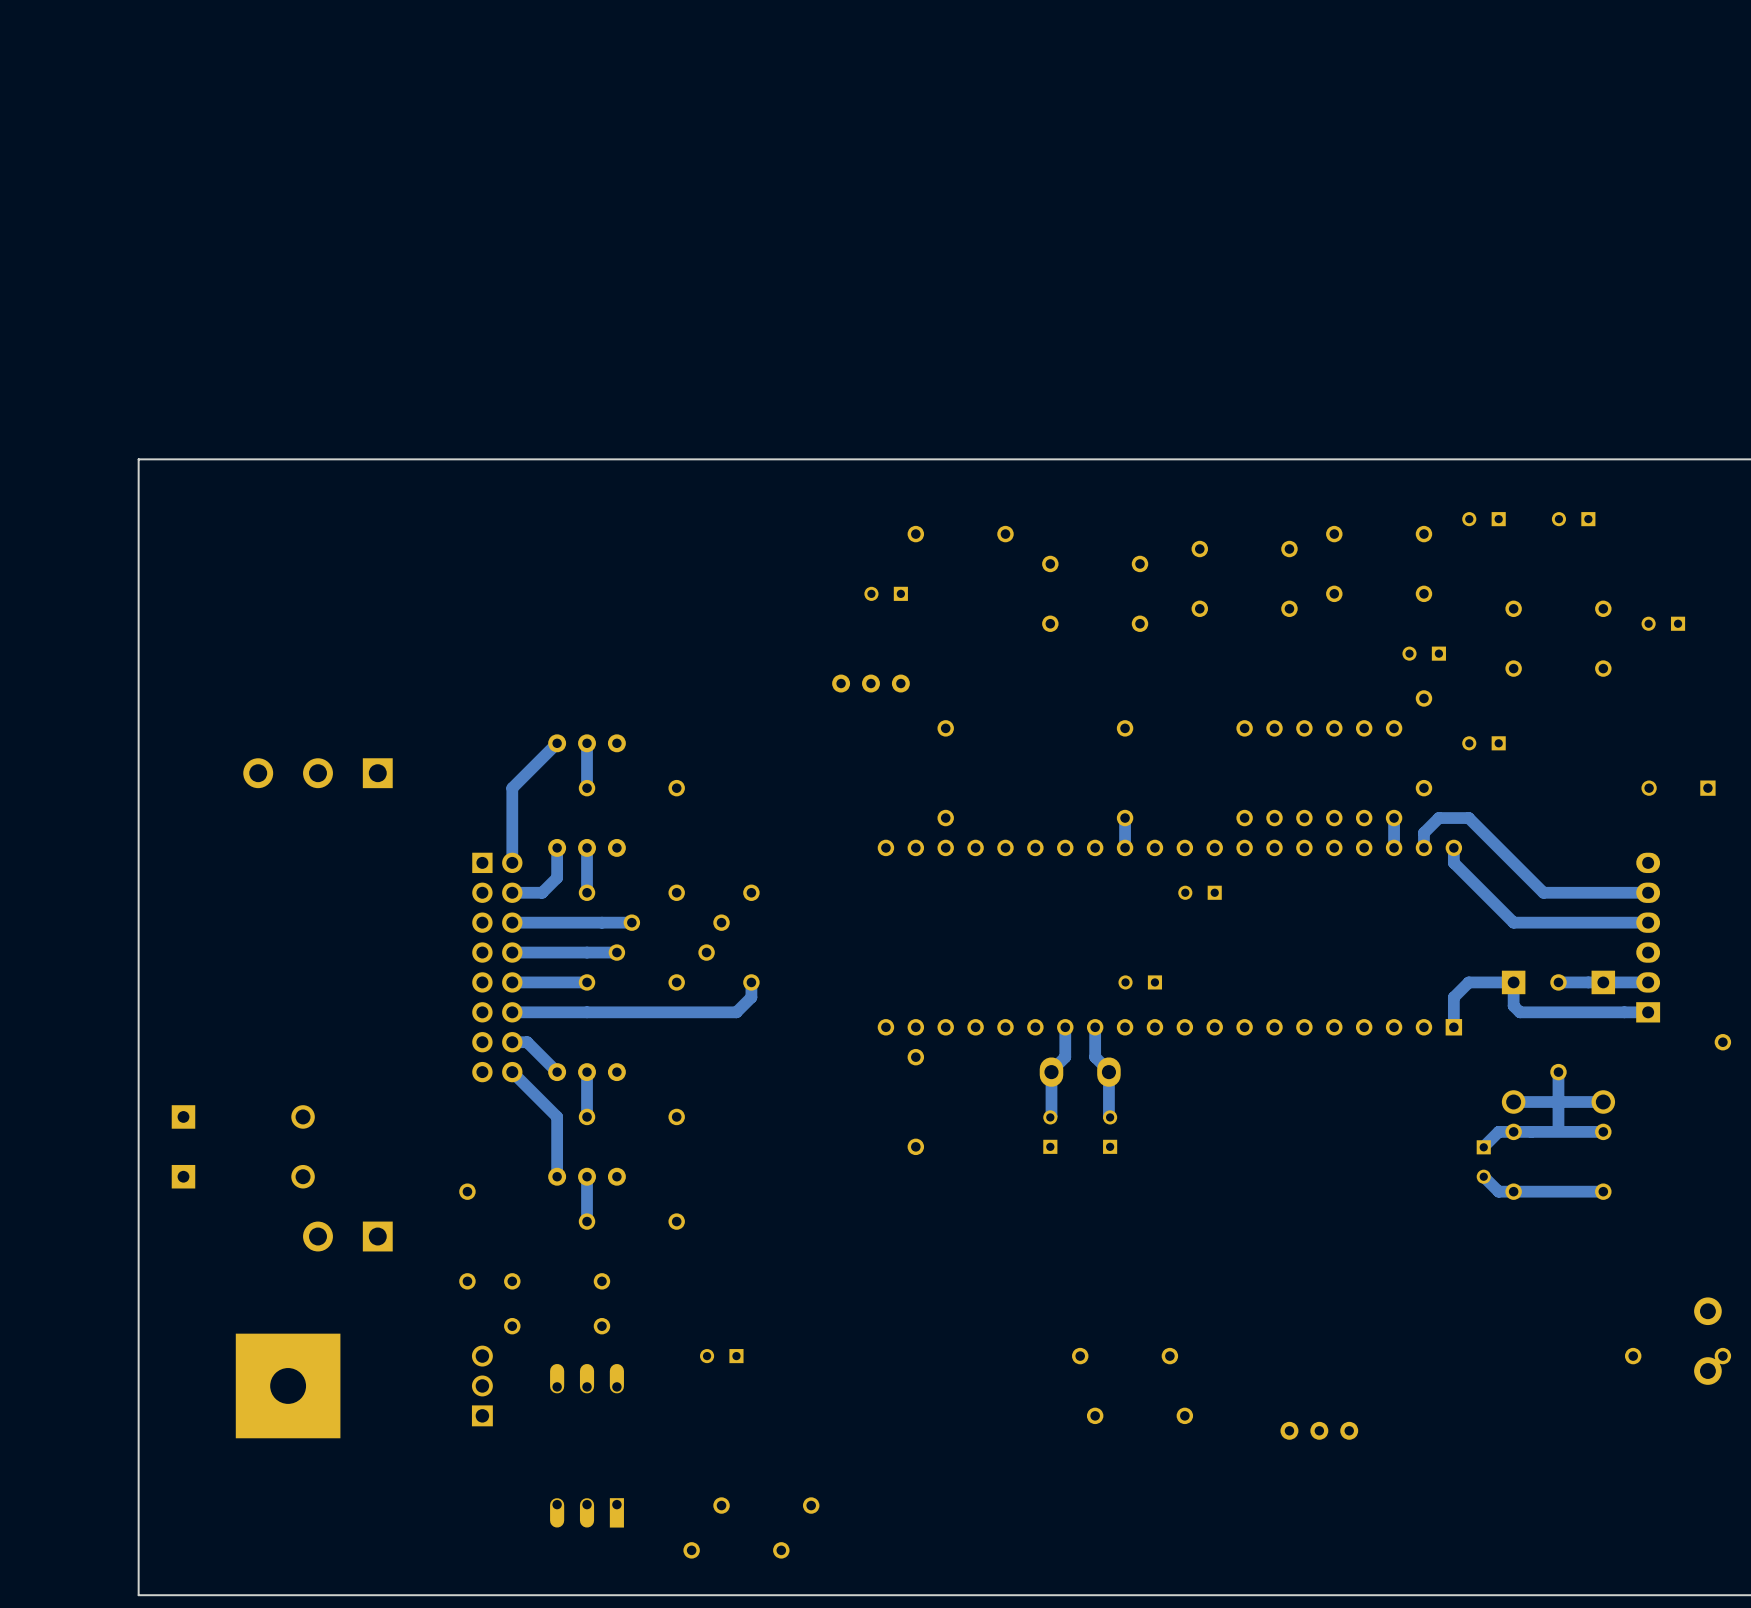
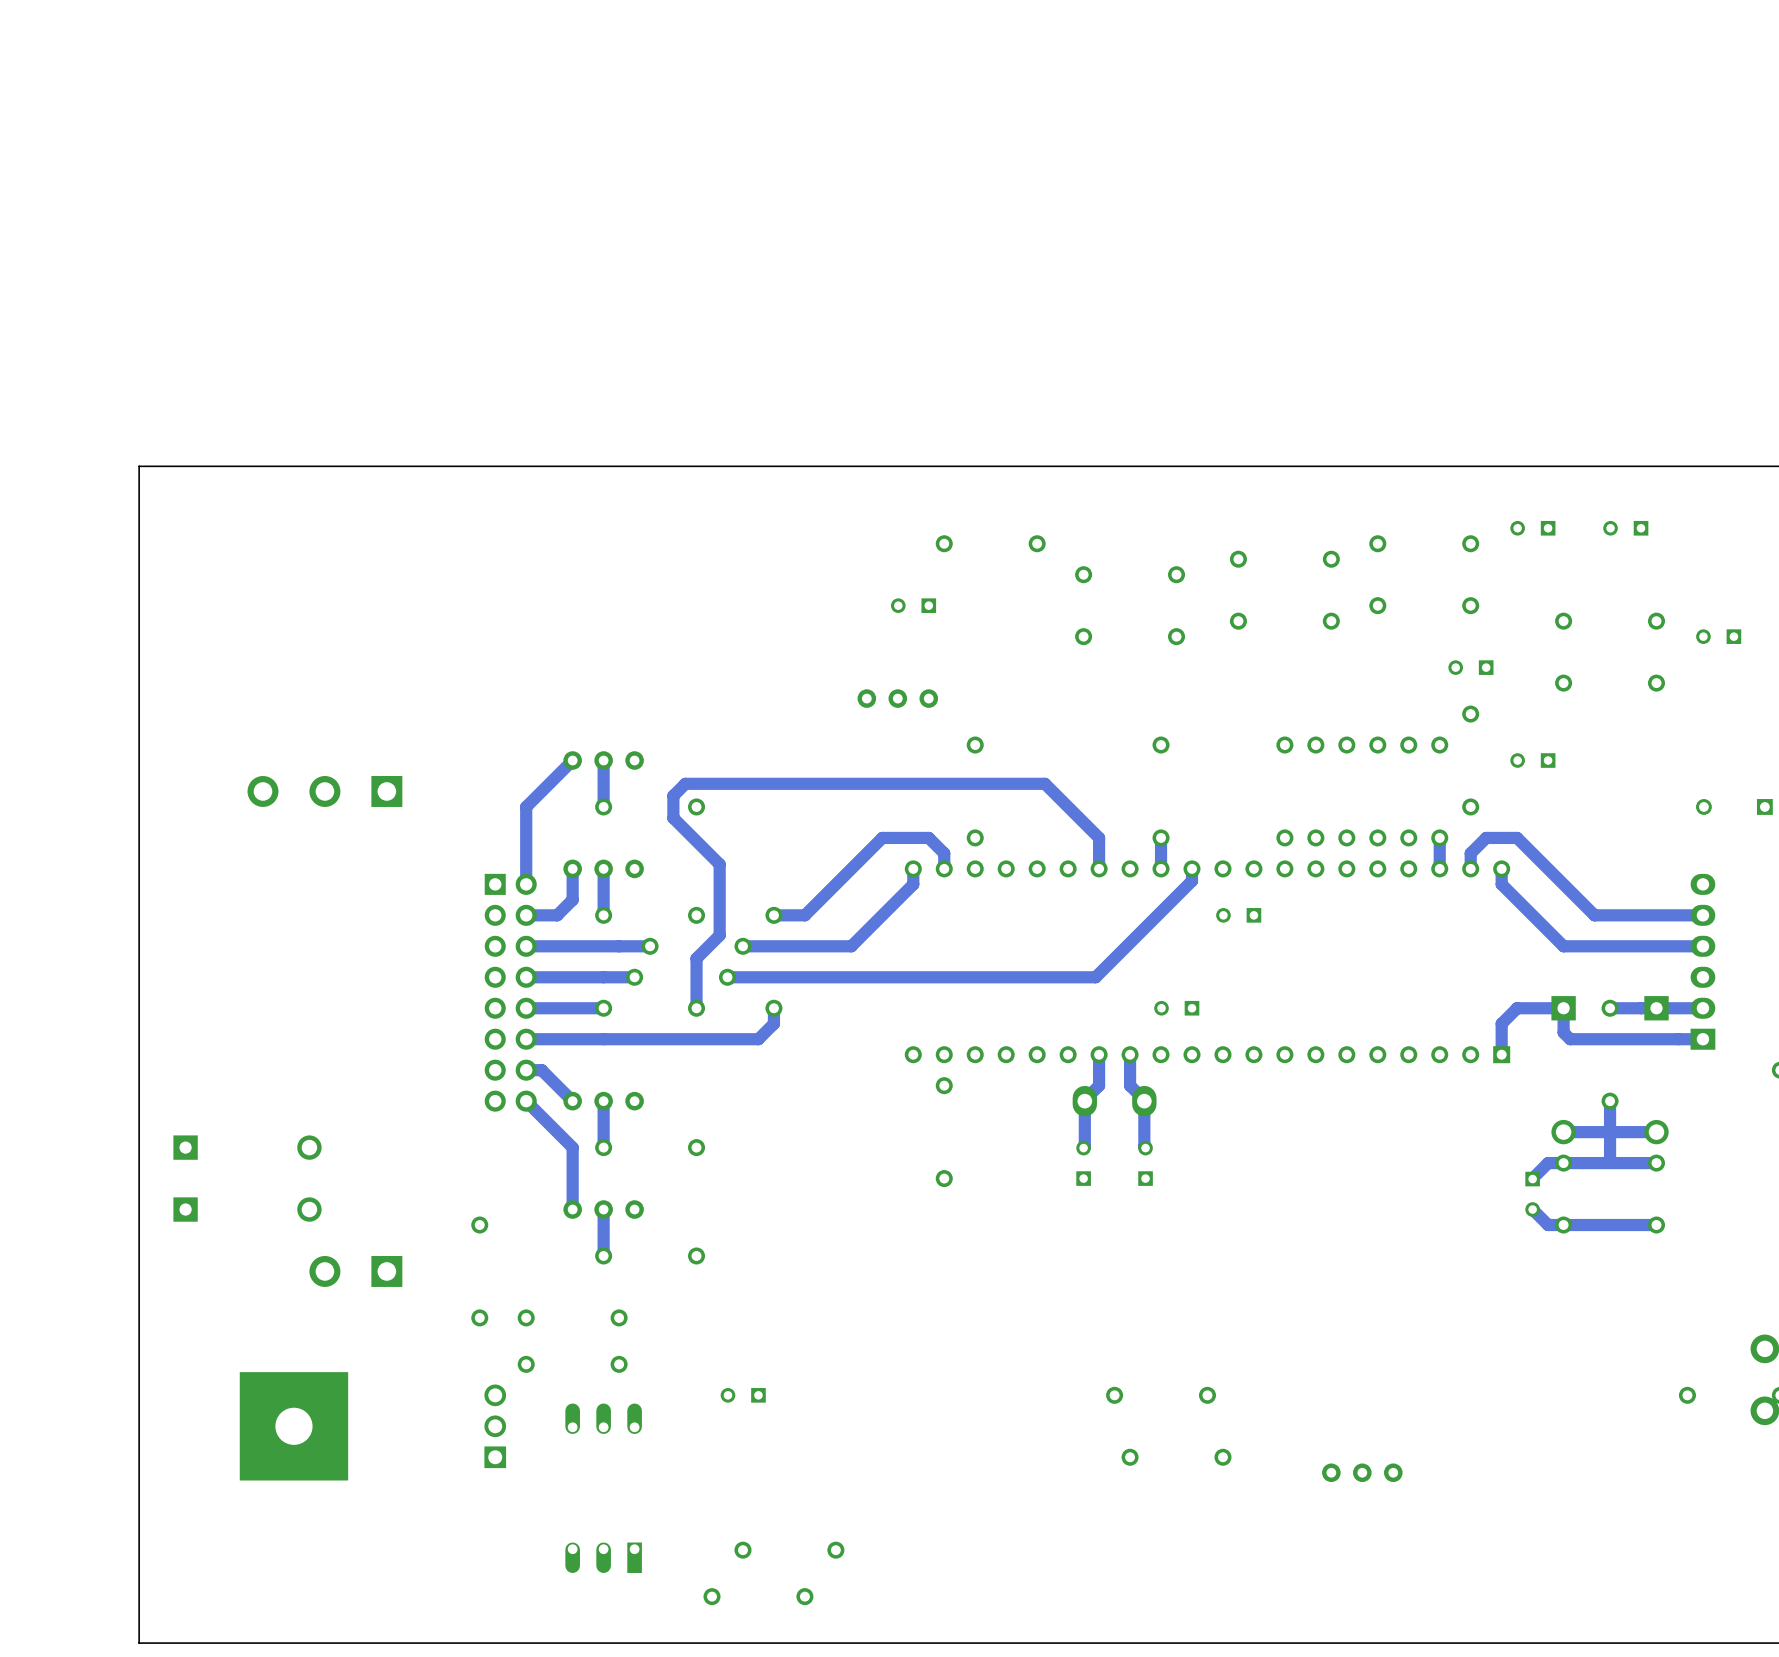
track: none -> (913, 868) (913, 884) (851, 946) (742, 946)
track: none -> (944, 868) (944, 853) (928, 837) (882, 837) (804, 915) (773, 915)
track: none -> (1099, 868) (1099, 837) (1044, 783) (685, 783) (673, 795) (673, 818) (719, 864) (719, 935) (696, 958) (696, 1008)
track: none -> (1192, 868) (1192, 880) (1095, 977) (727, 977)

